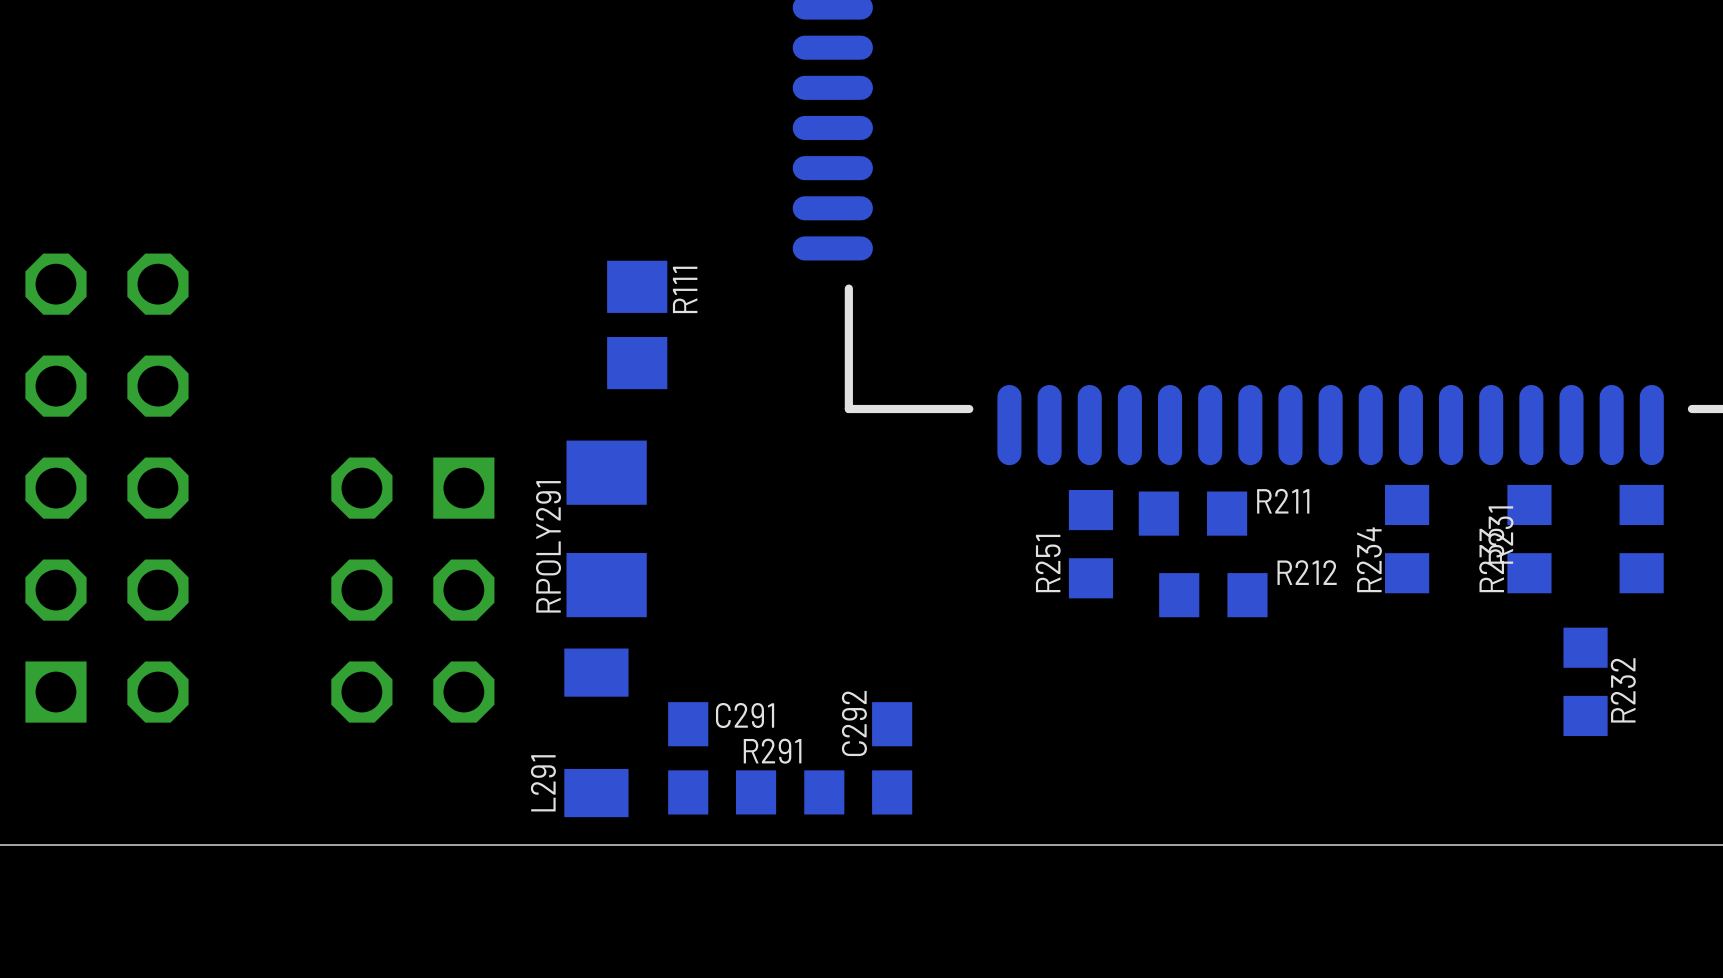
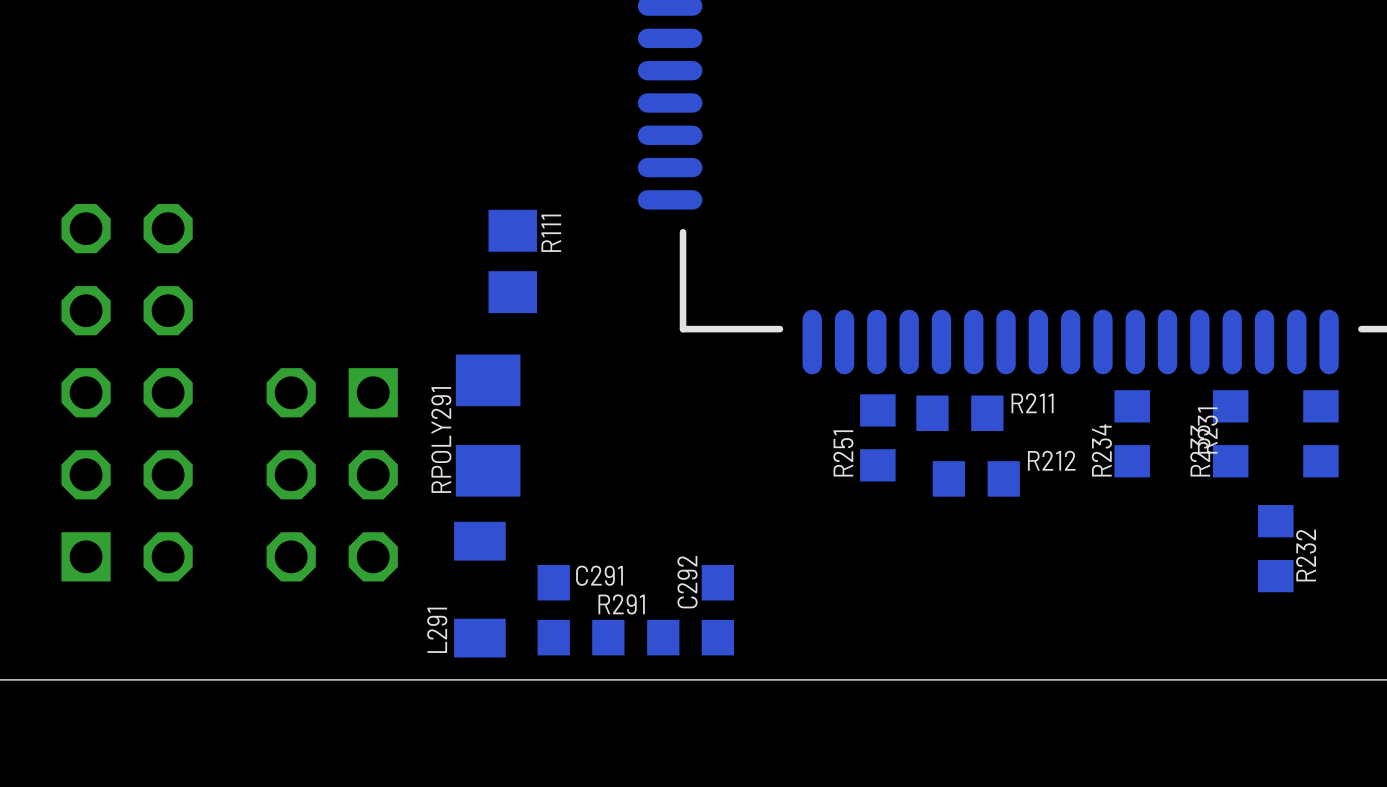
part position: (106, 488) -> (127, 392)

